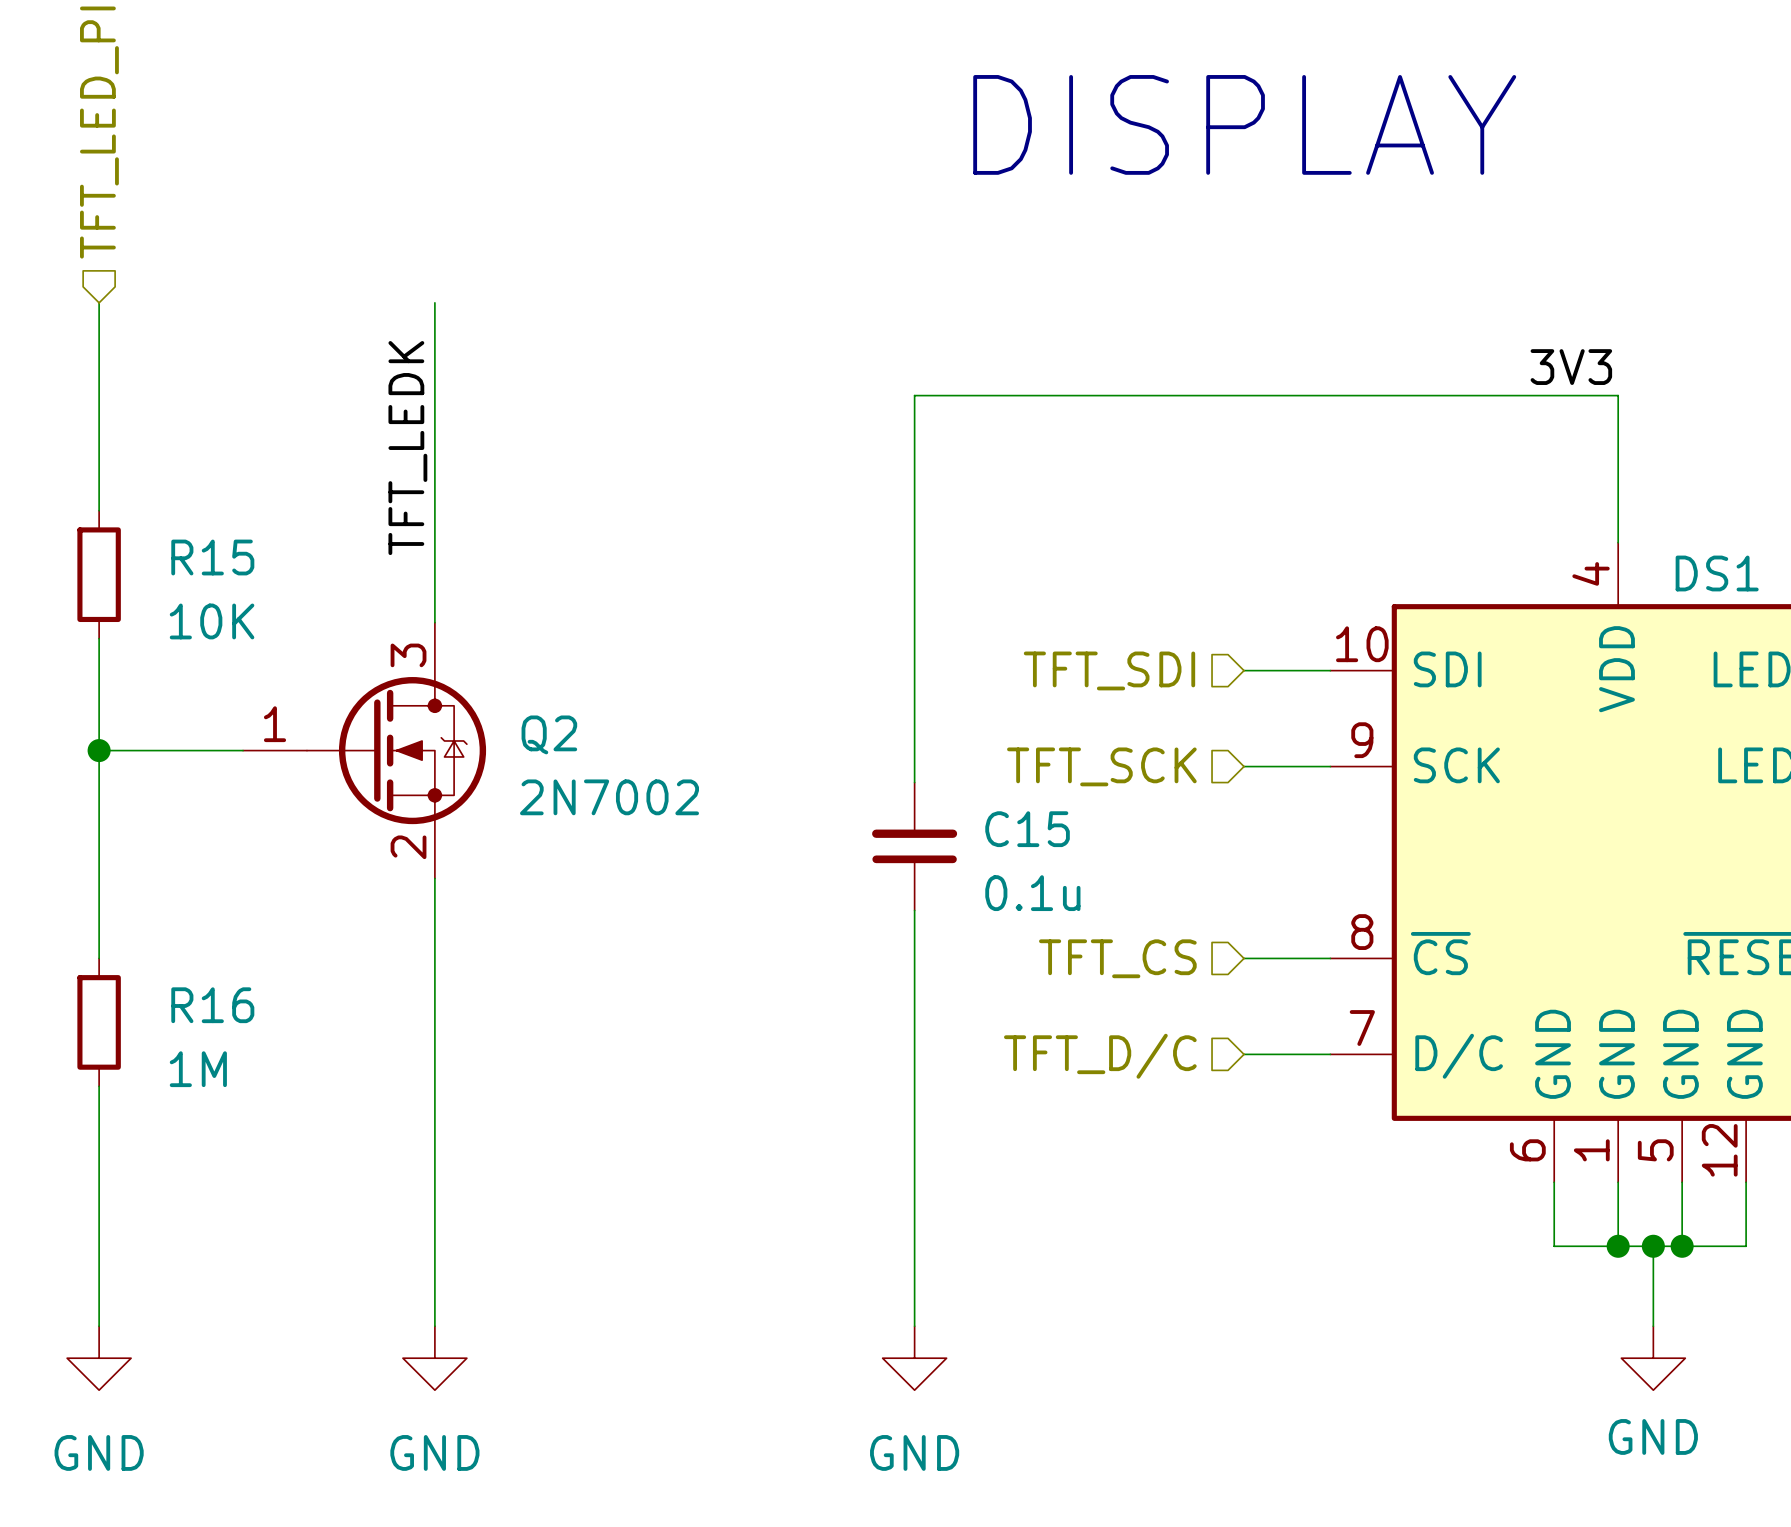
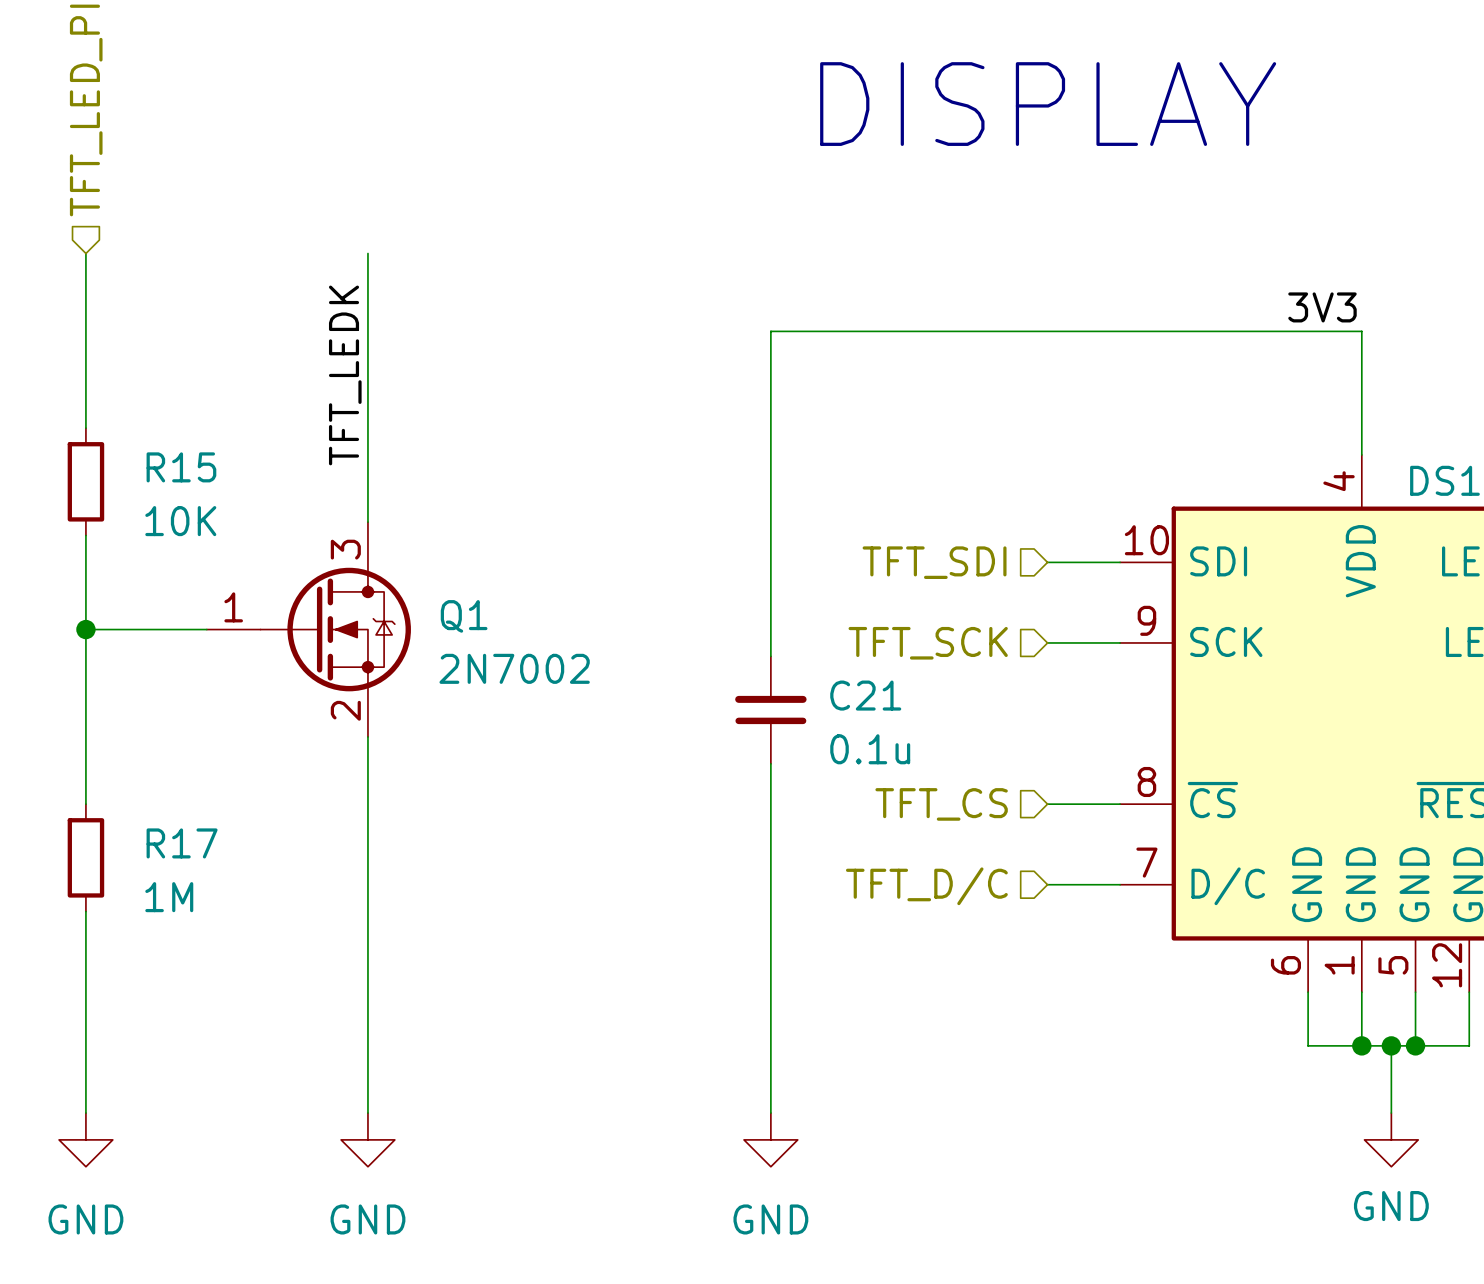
Q2 name: Q2 (549, 734) -> Q1 (464, 616)
C15 name: C15 (1027, 829) -> C21 (865, 695)
R16 name: R16 (212, 1005) -> R17 (182, 843)

